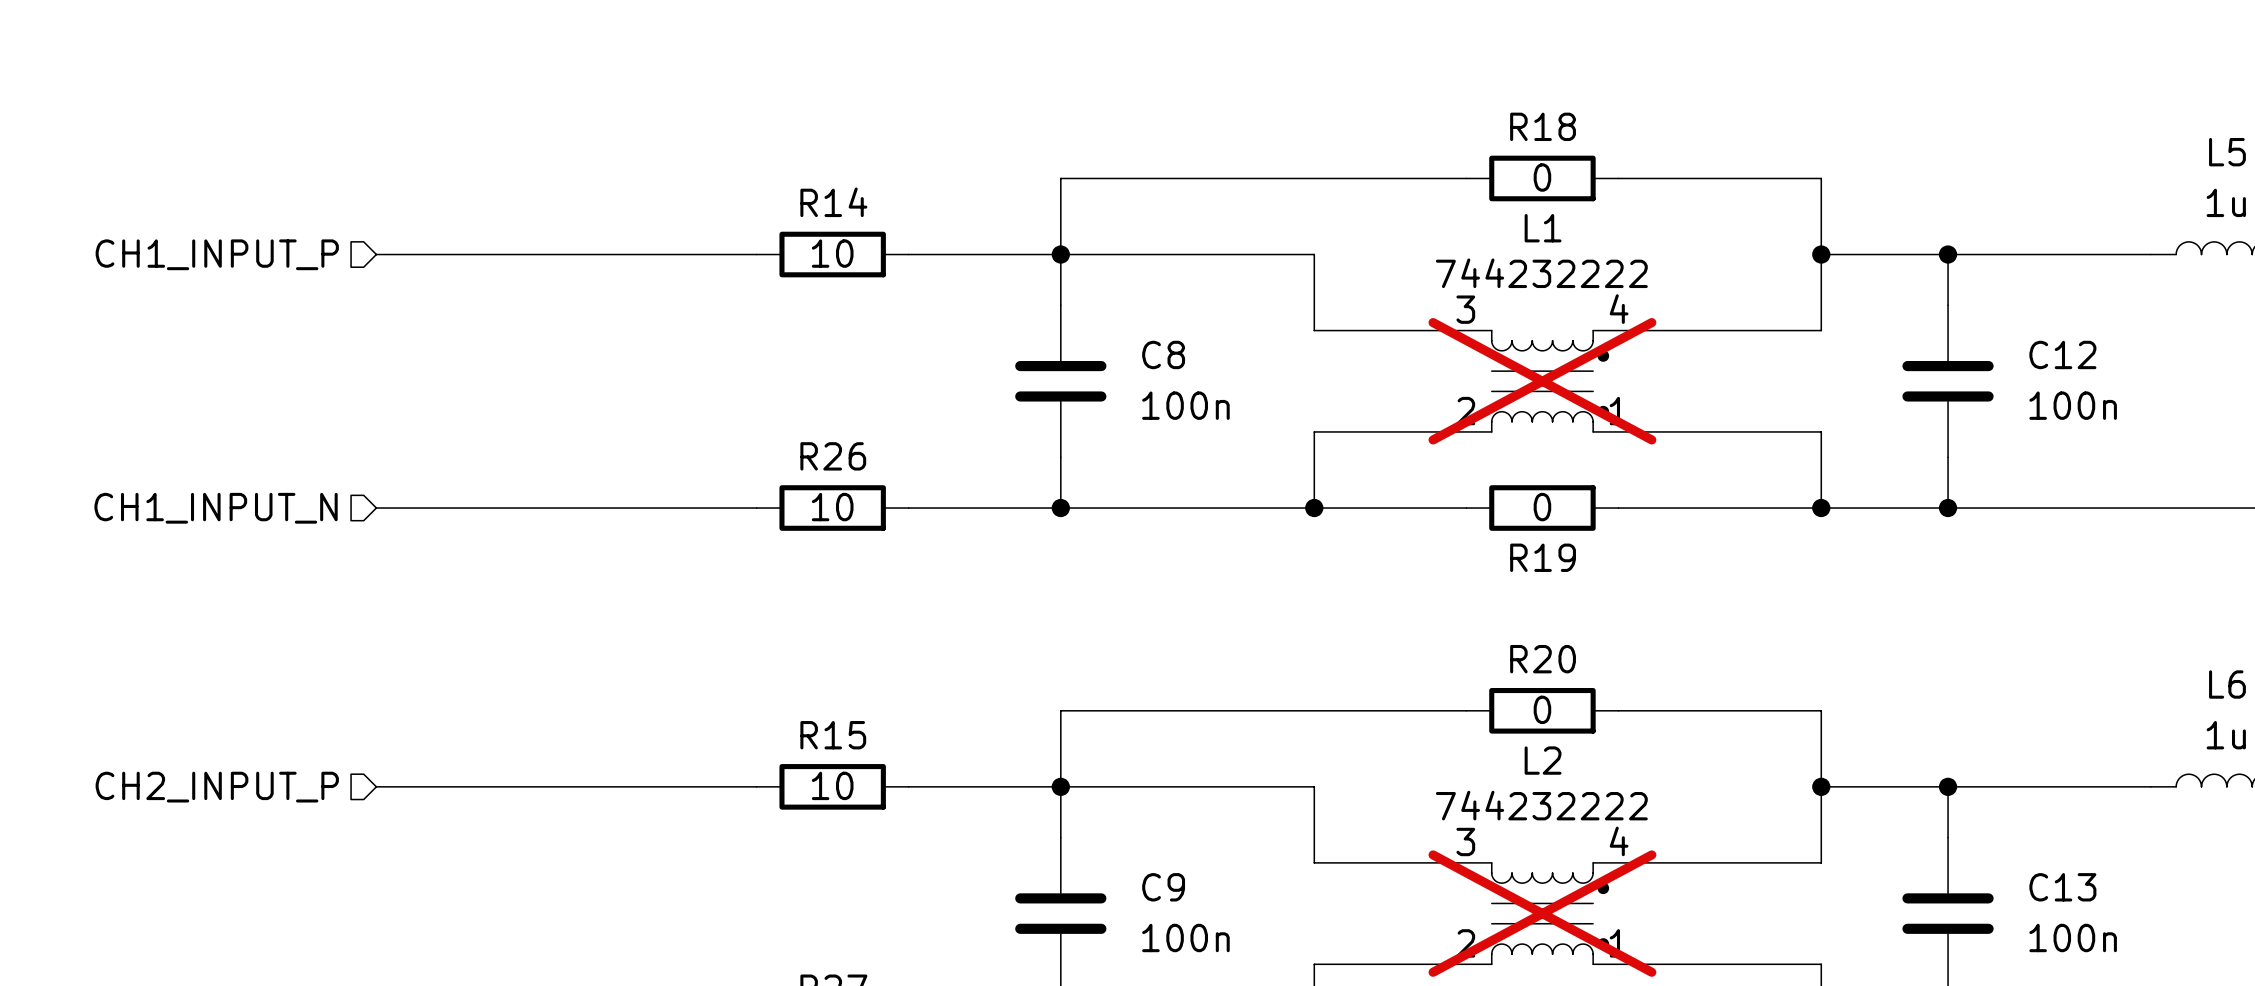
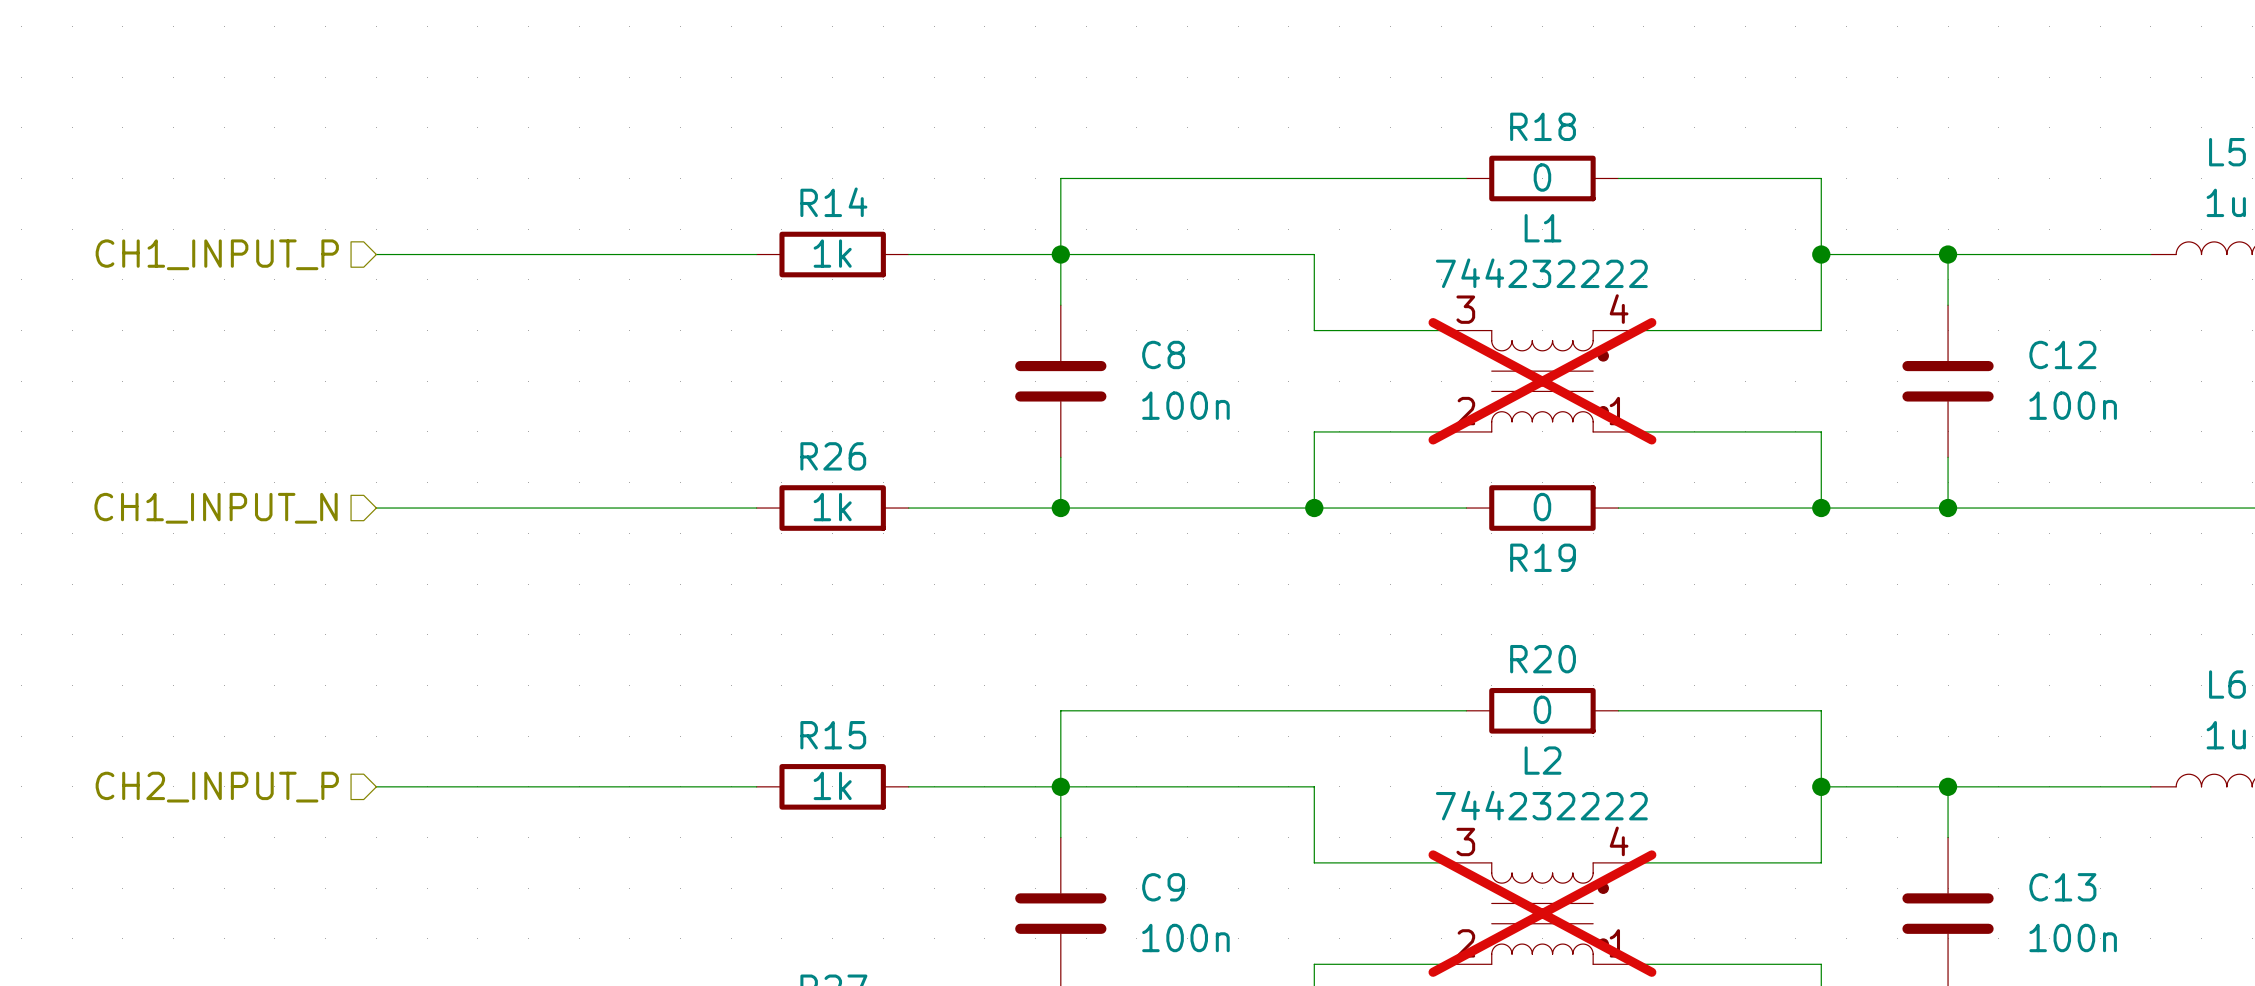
R14 value: 10 (832, 253) -> 1k (832, 253)
R26 value: 10 (832, 507) -> 1k (832, 507)
R15 value: 10 (832, 785) -> 1k (832, 785)

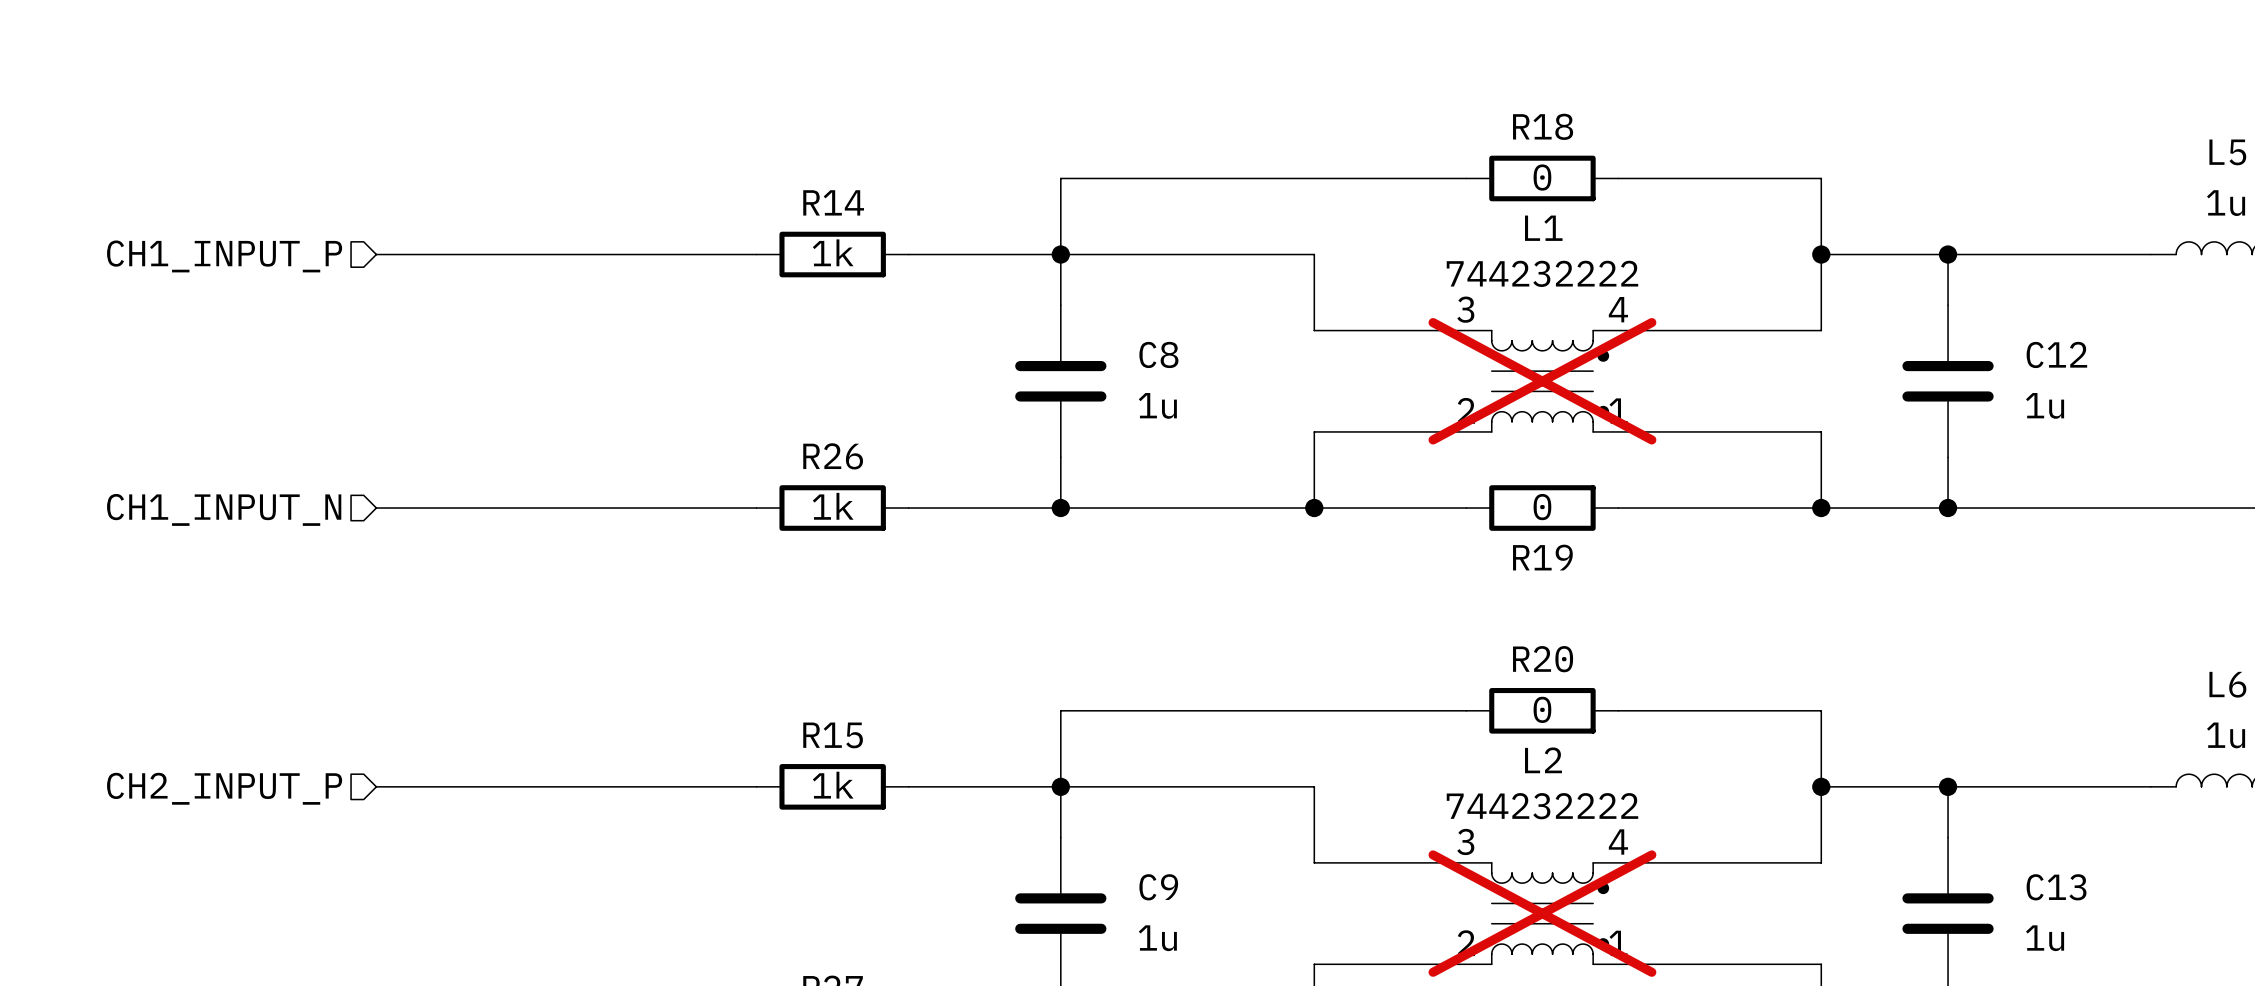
C8 value: 100n (1185, 405) -> 1u (1157, 405)
C12 value: 100n (2073, 405) -> 1u (2045, 405)
C9 value: 100n (1185, 938) -> 1u (1157, 938)
C13 value: 100n (2073, 938) -> 1u (2045, 938)

